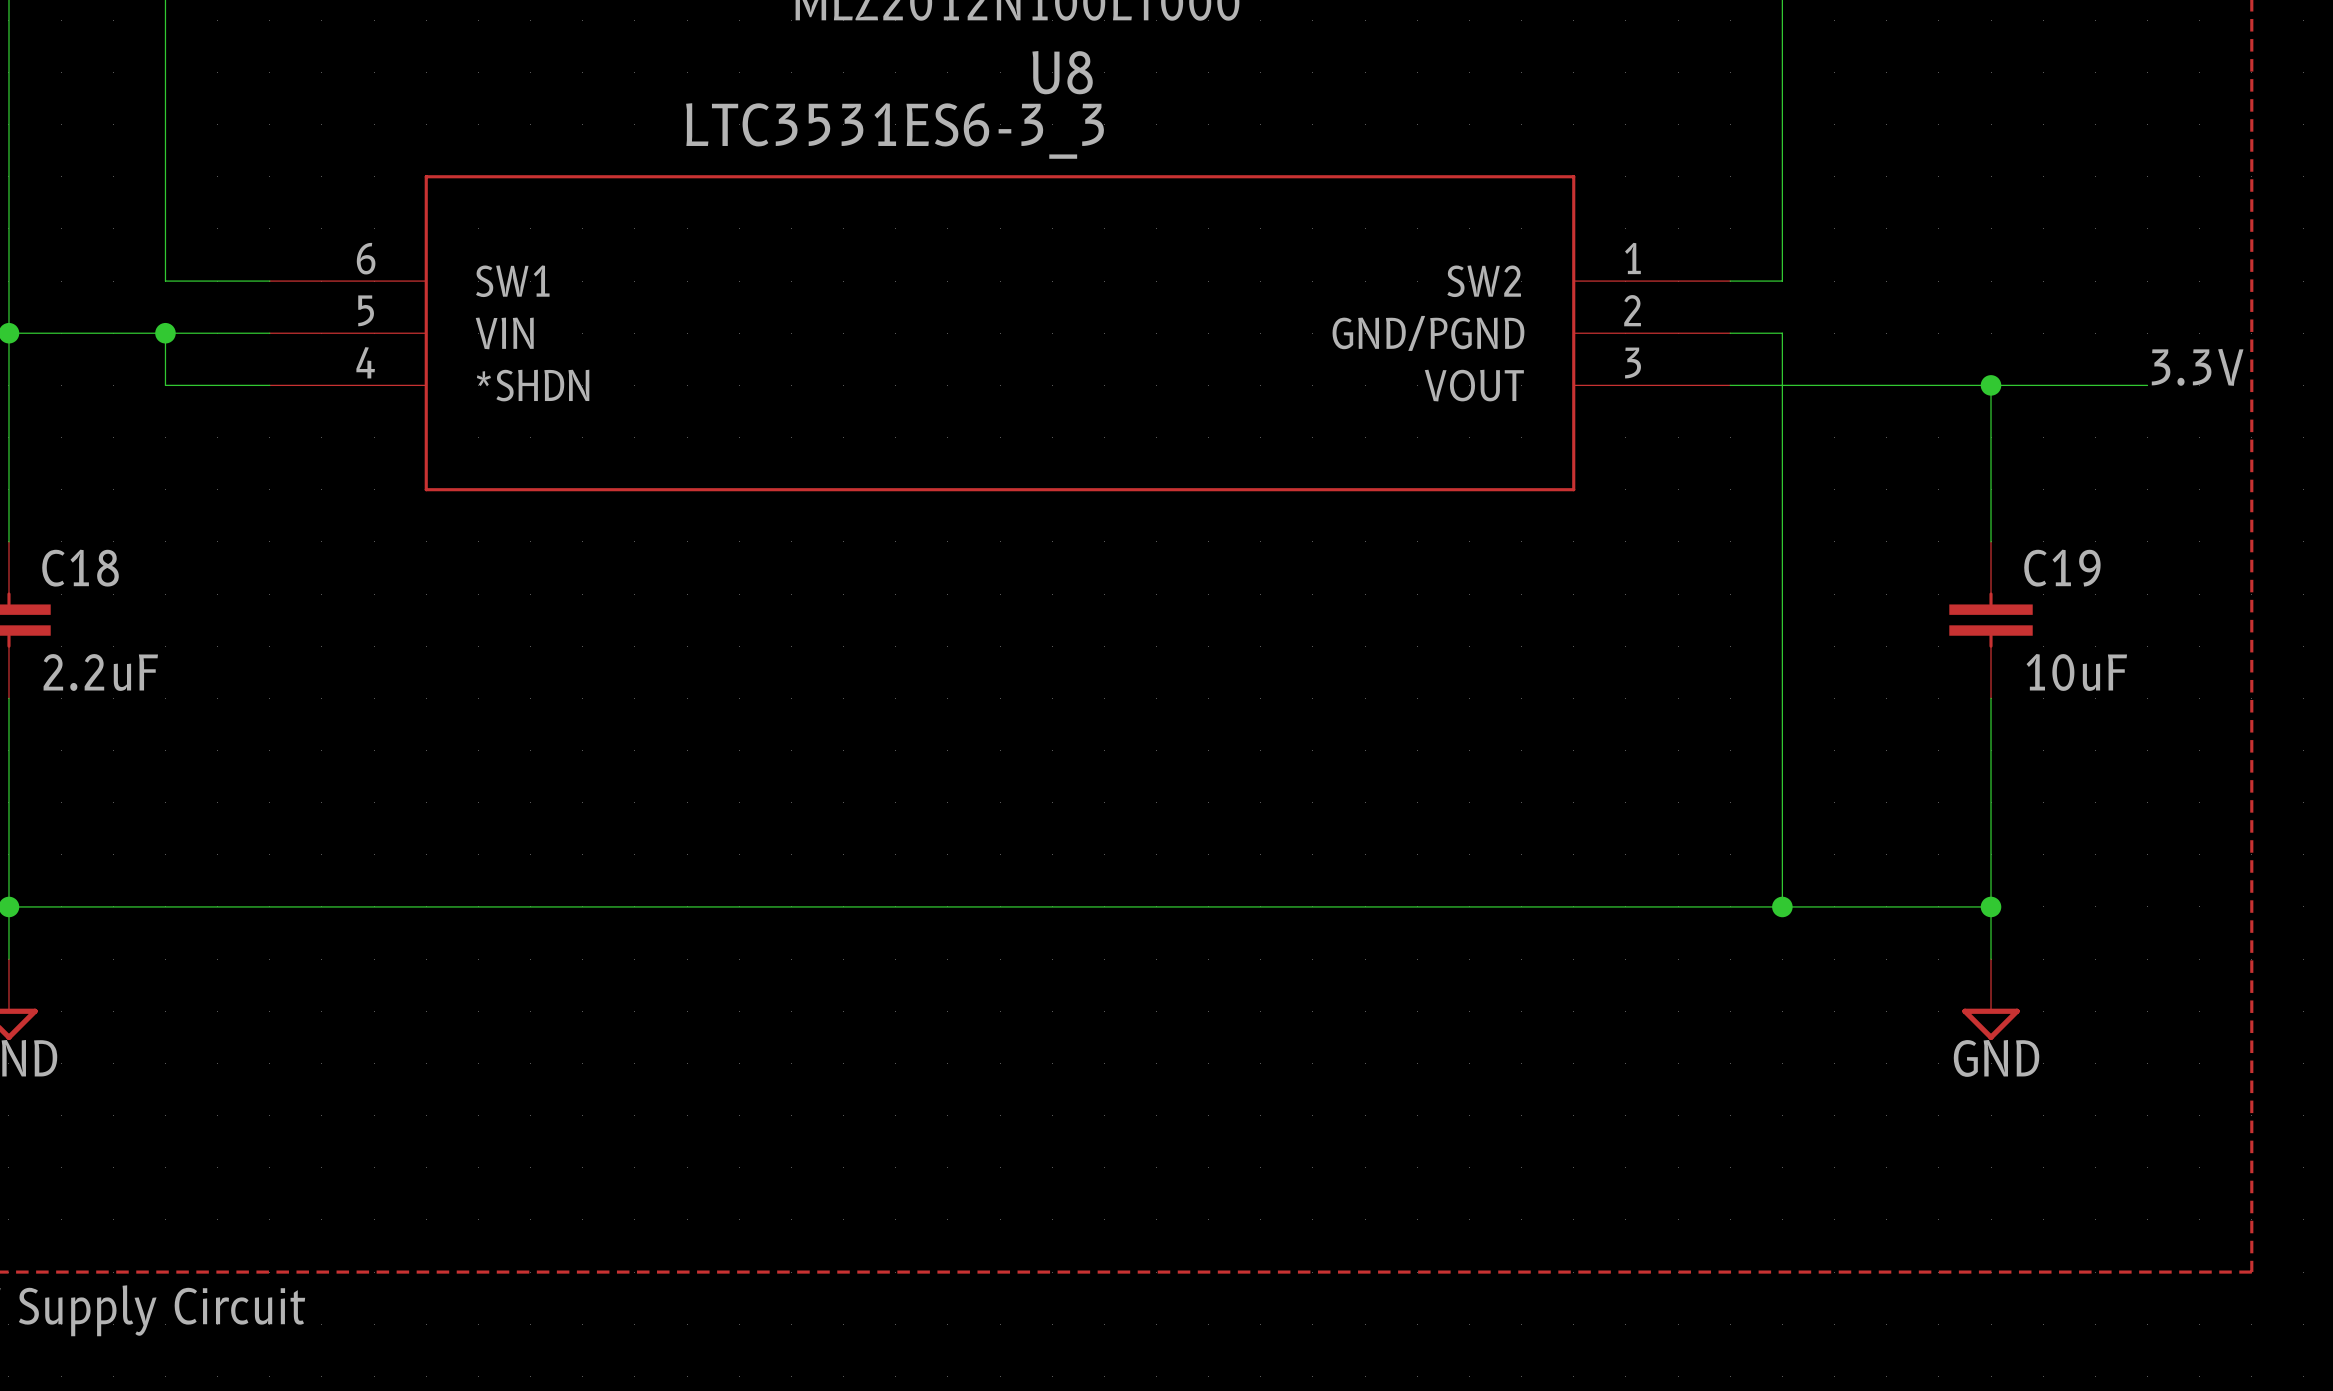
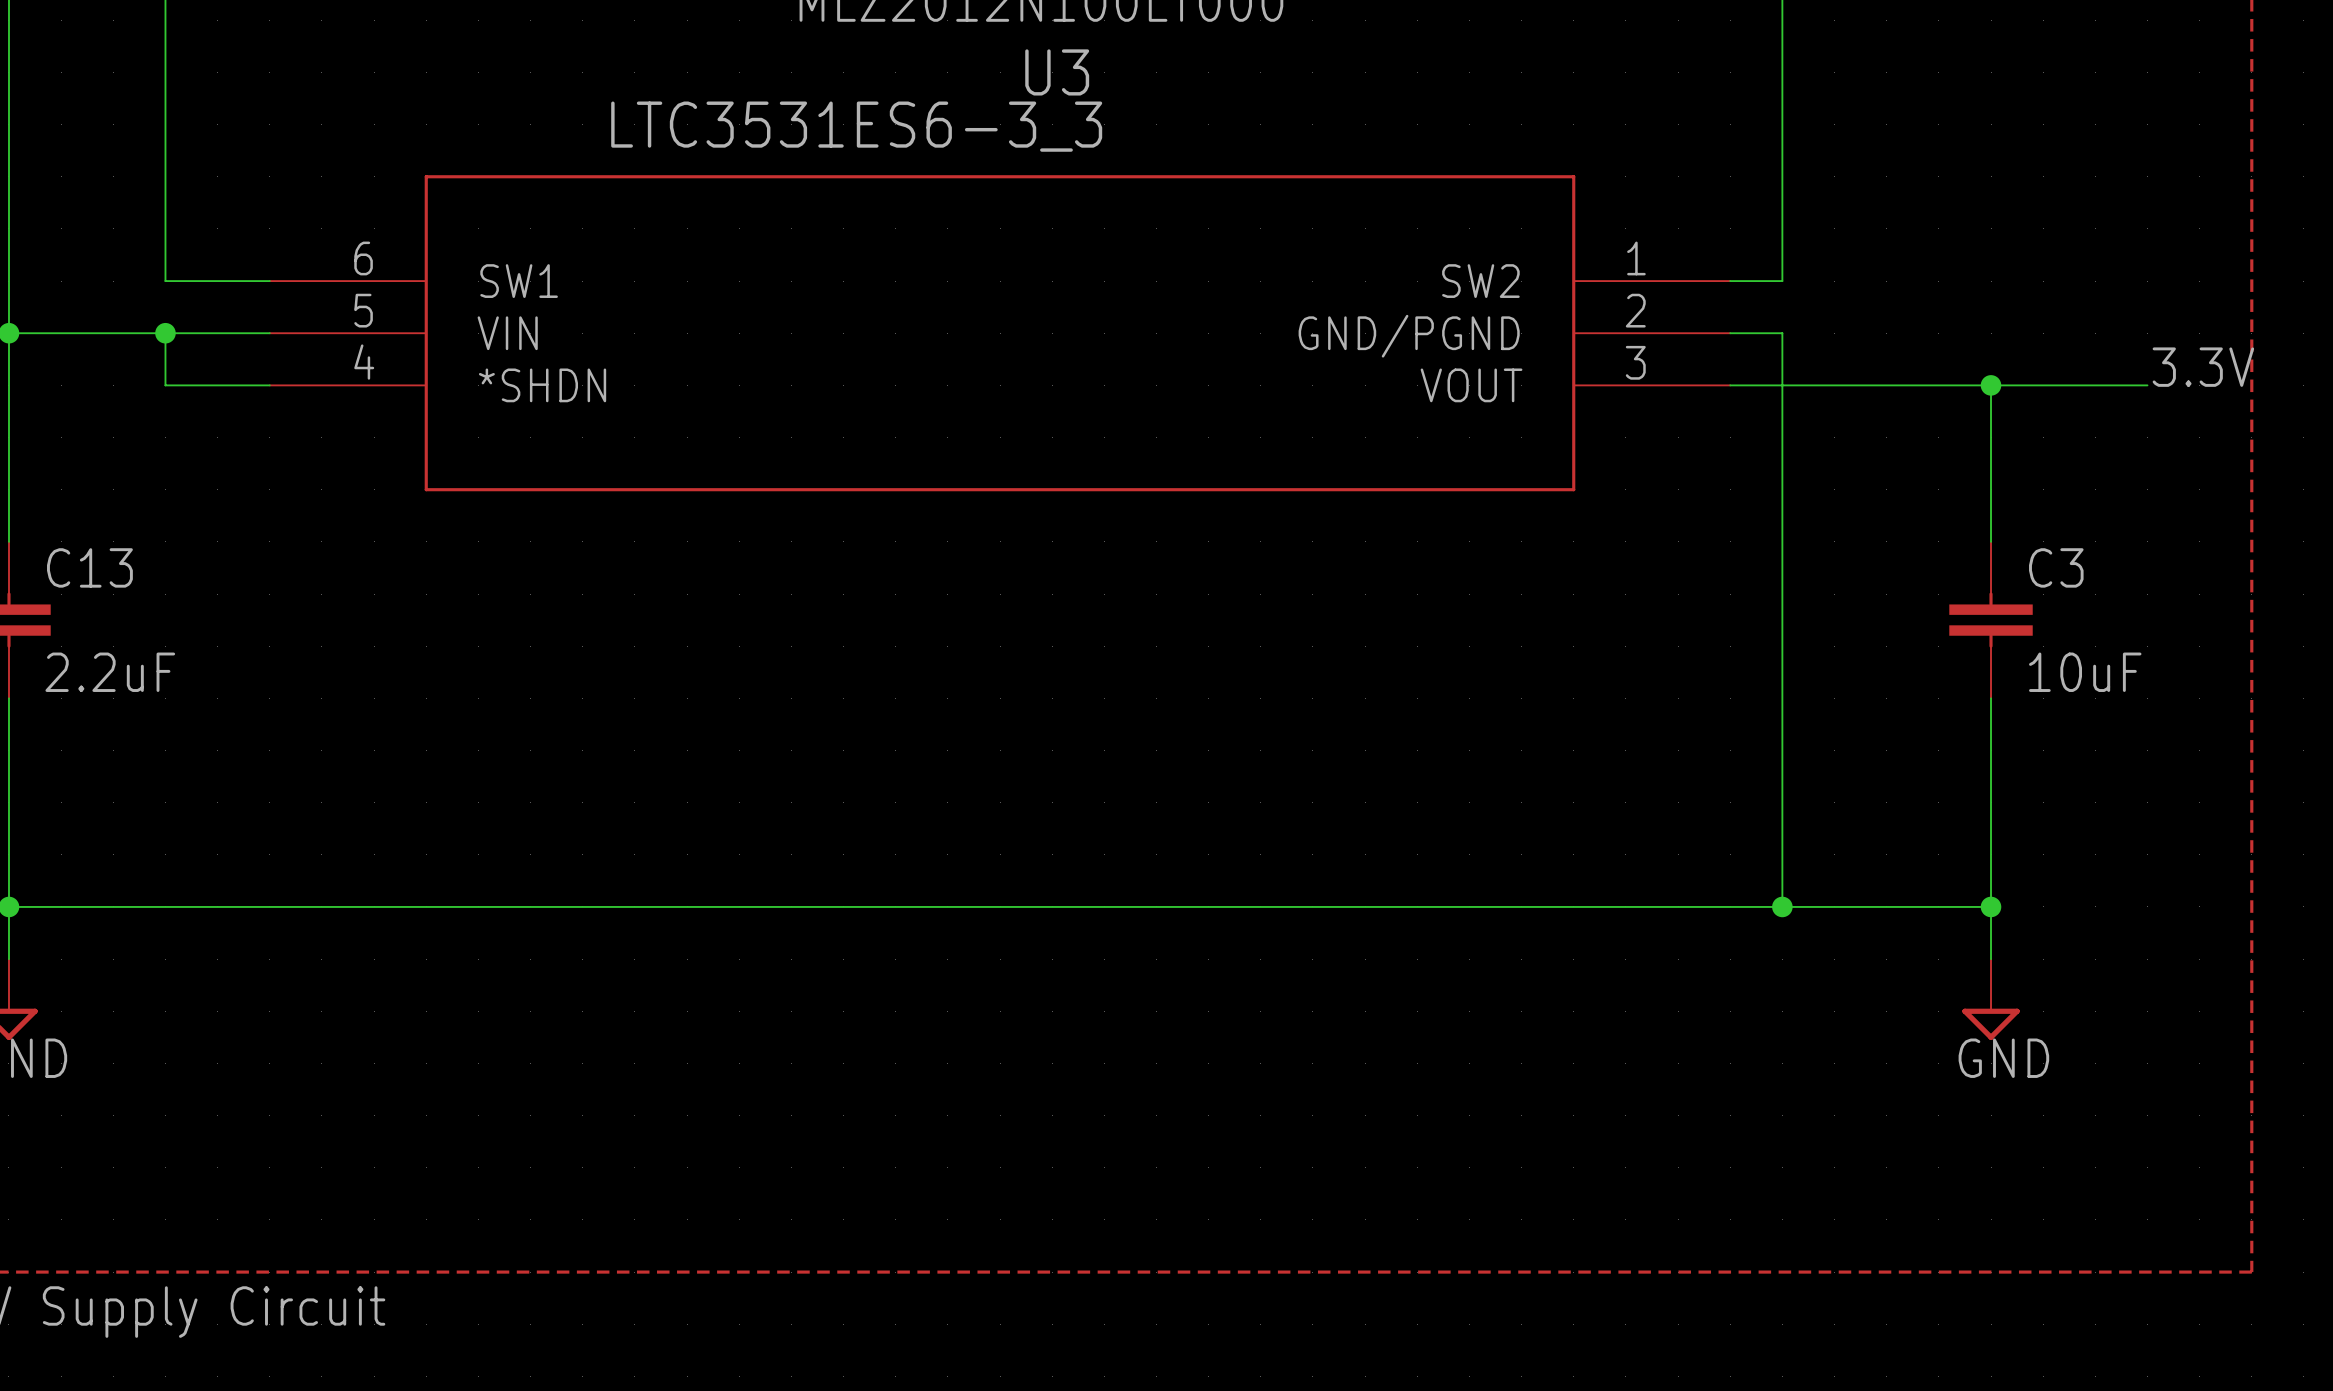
U8 name: U8 (1062, 72) -> U3 (1057, 72)
C18 name: C18 (80, 568) -> C13 (89, 567)
C19 name: C19 (2062, 568) -> C3 (2056, 567)

